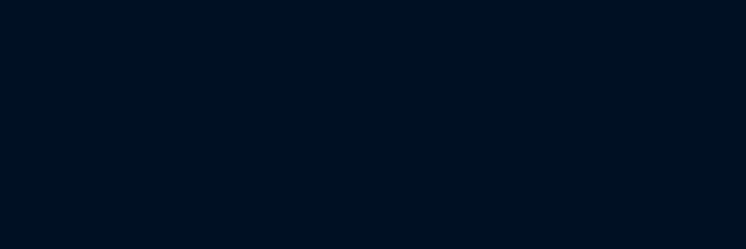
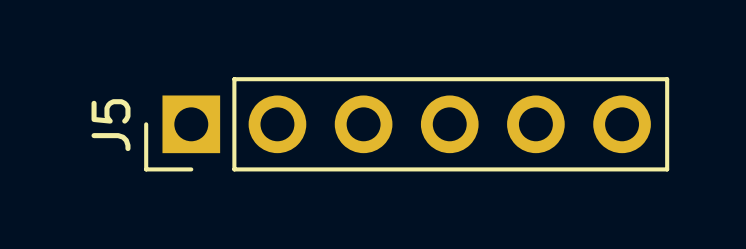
J5: none -> (406, 124)

